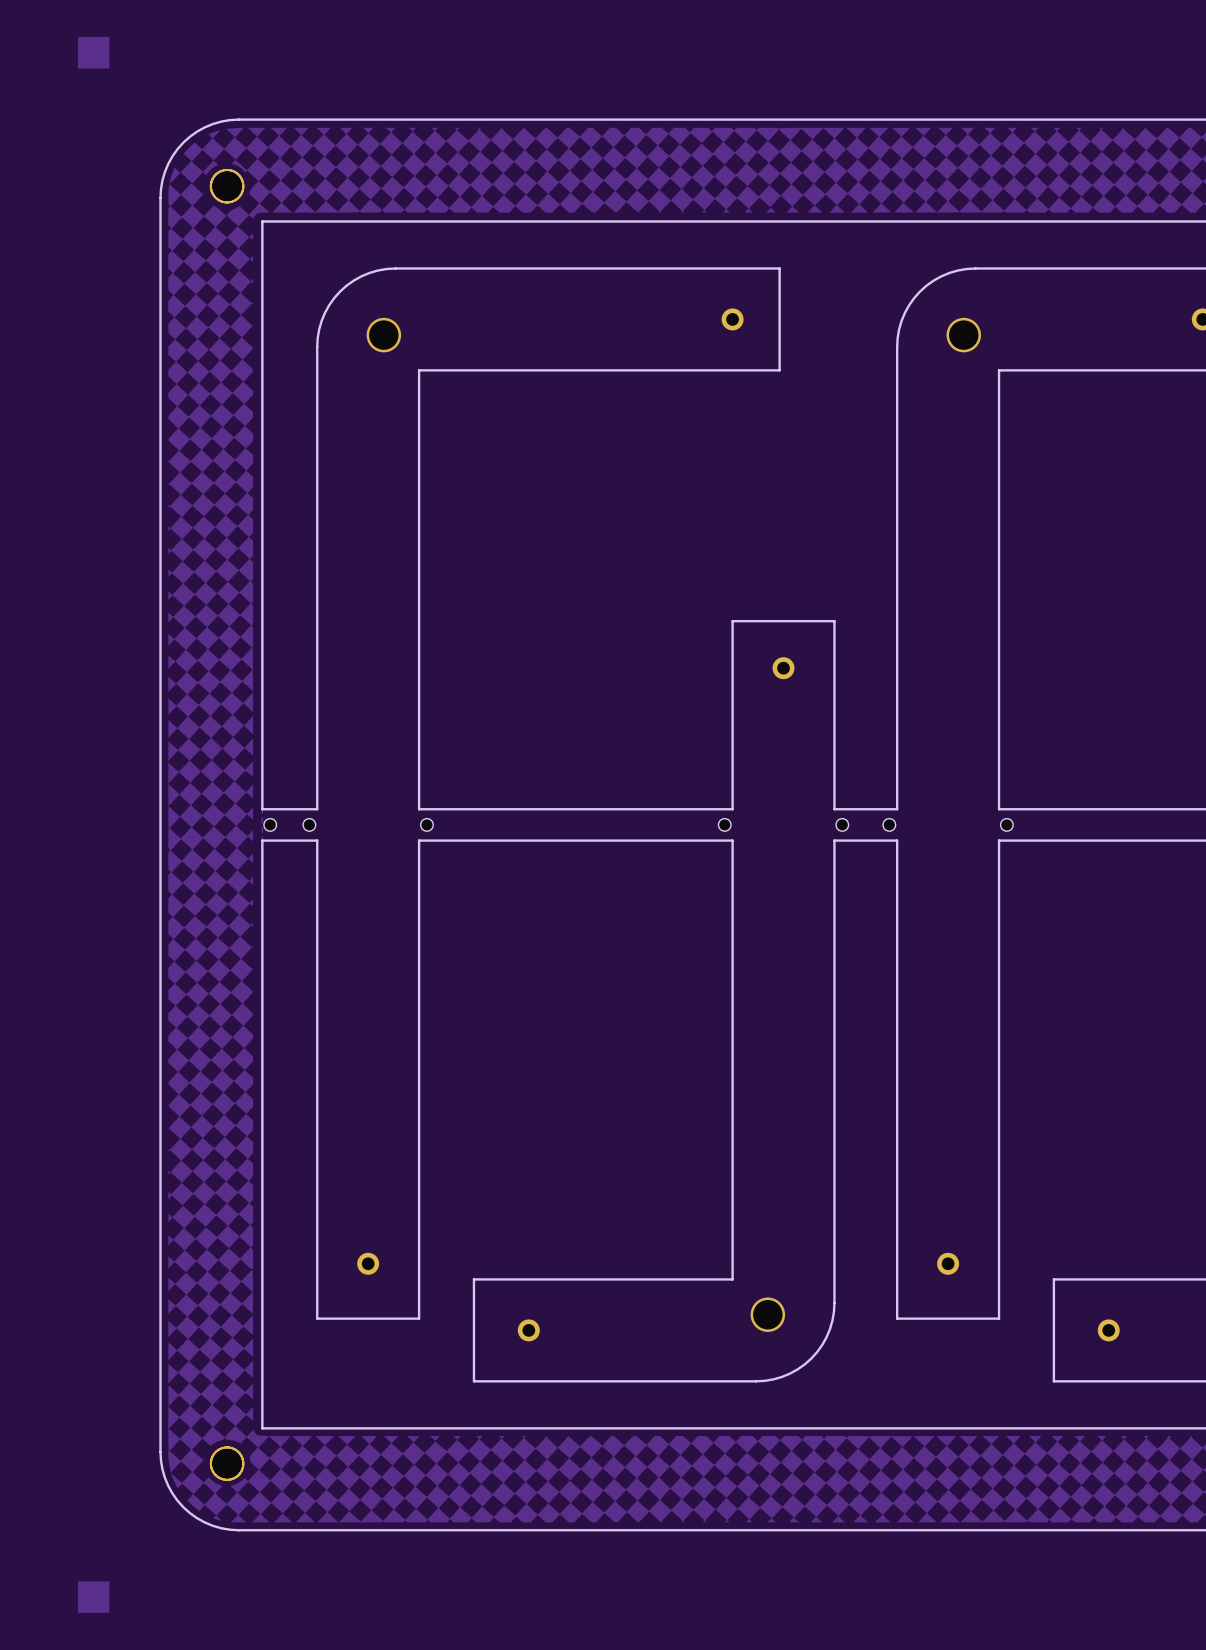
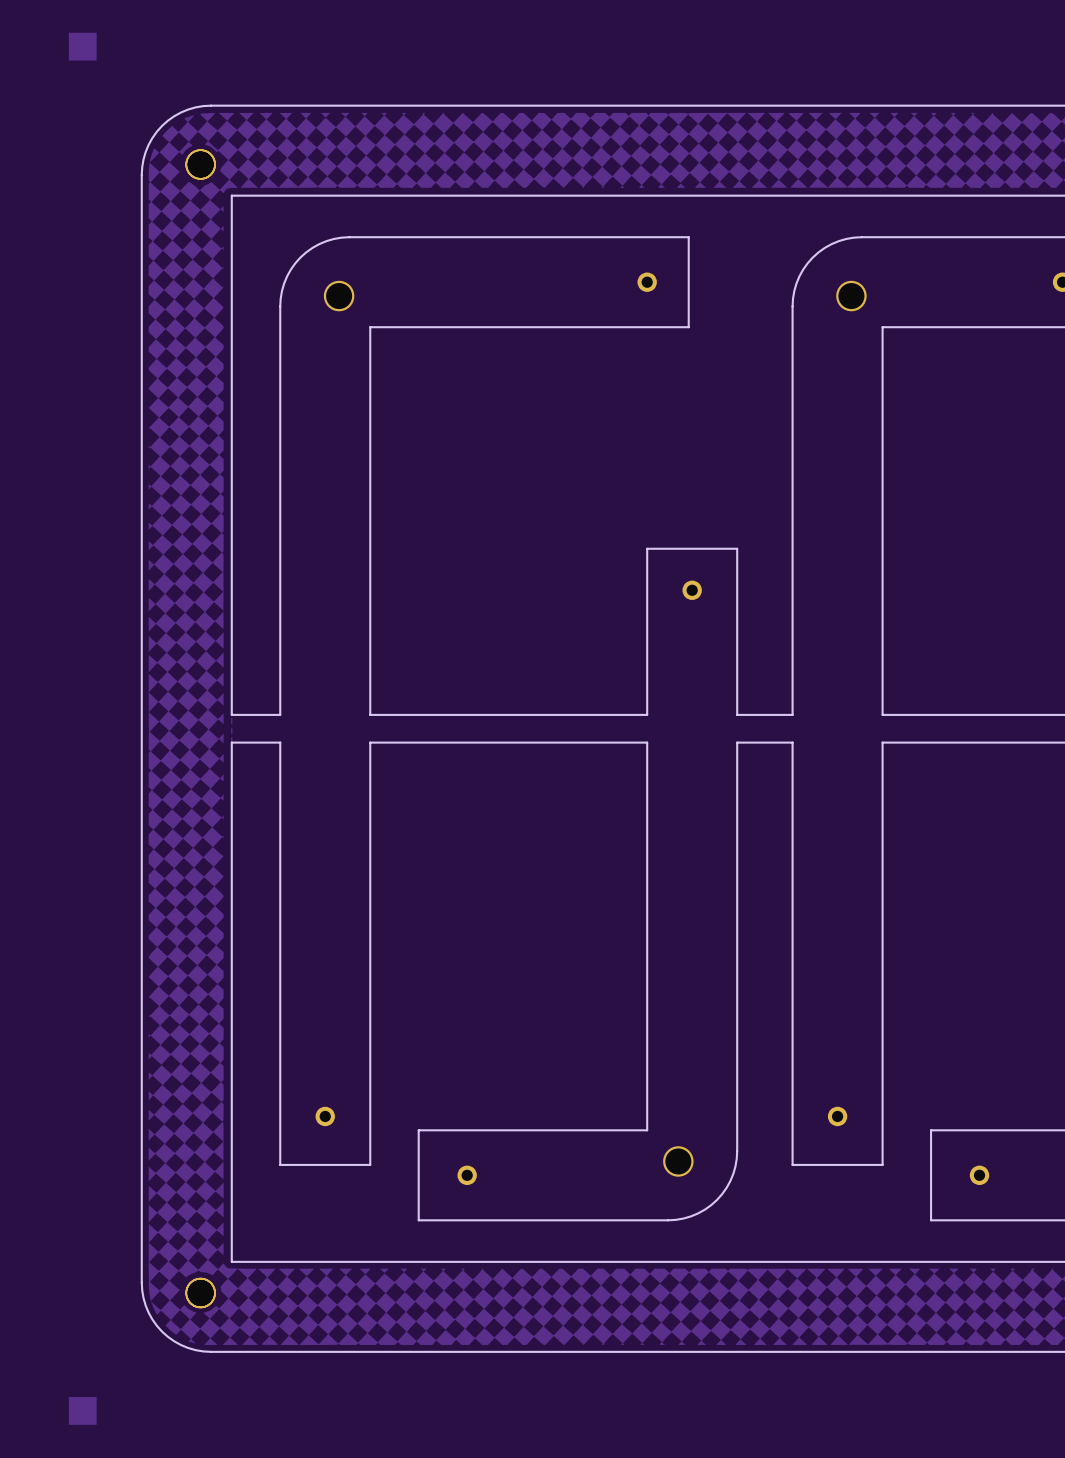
part: (270, 824) -> none
part: (309, 824) -> none
part: (426, 824) -> none
part: (724, 824) -> none
part: (842, 824) -> none
part: (889, 824) -> none
part: (1006, 824) -> none

